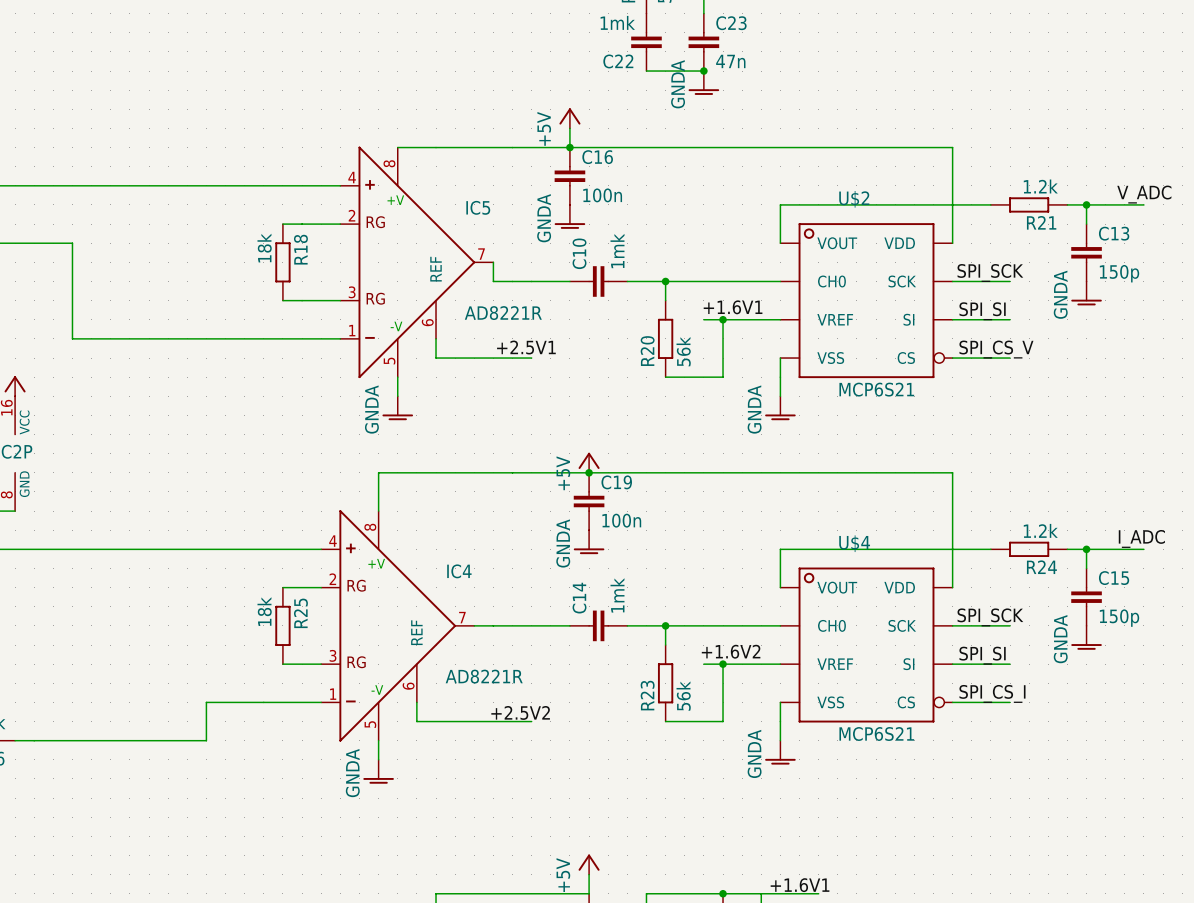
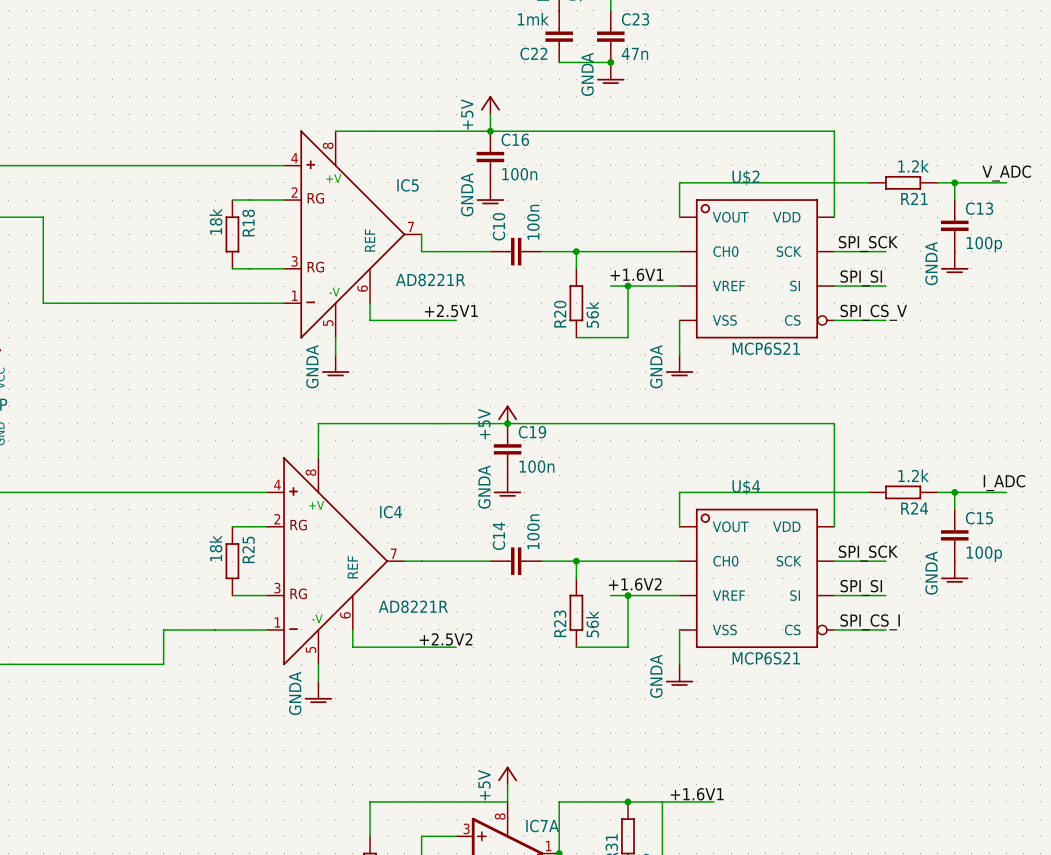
C10 value: 1mk (617, 251) -> 100n (533, 222)
C13 value: 150p (1119, 273) -> 100p (984, 244)
C14 value: 1mk (617, 595) -> 100n (533, 531)
C15 value: 150p (1119, 618) -> 100p (984, 554)

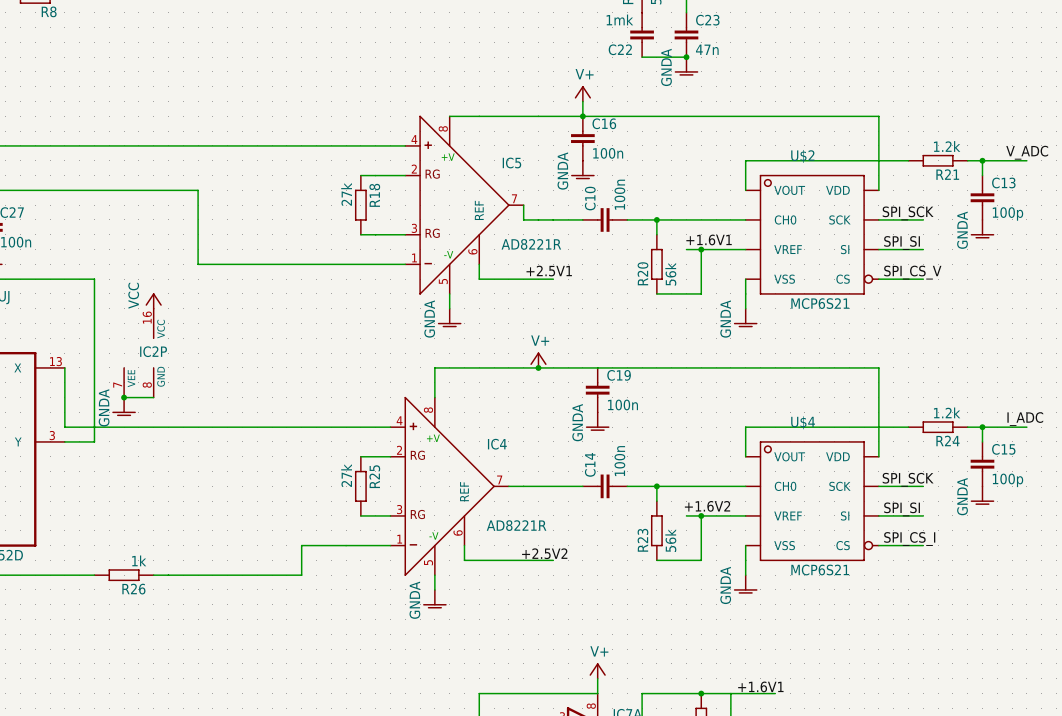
power symbol: +5V (490, 105) -> V+ (582, 93)
R18 value: 18k (215, 221) -> 27k (346, 194)
power symbol: none -> V+ (538, 360)
power symbol: +5V (507, 414) -> none
junction: none -> (538, 367)
junction: (507, 423) -> none
R25 value: 18k (215, 548) -> 27k (346, 475)
power symbol: +5V (507, 775) -> V+ (597, 671)

